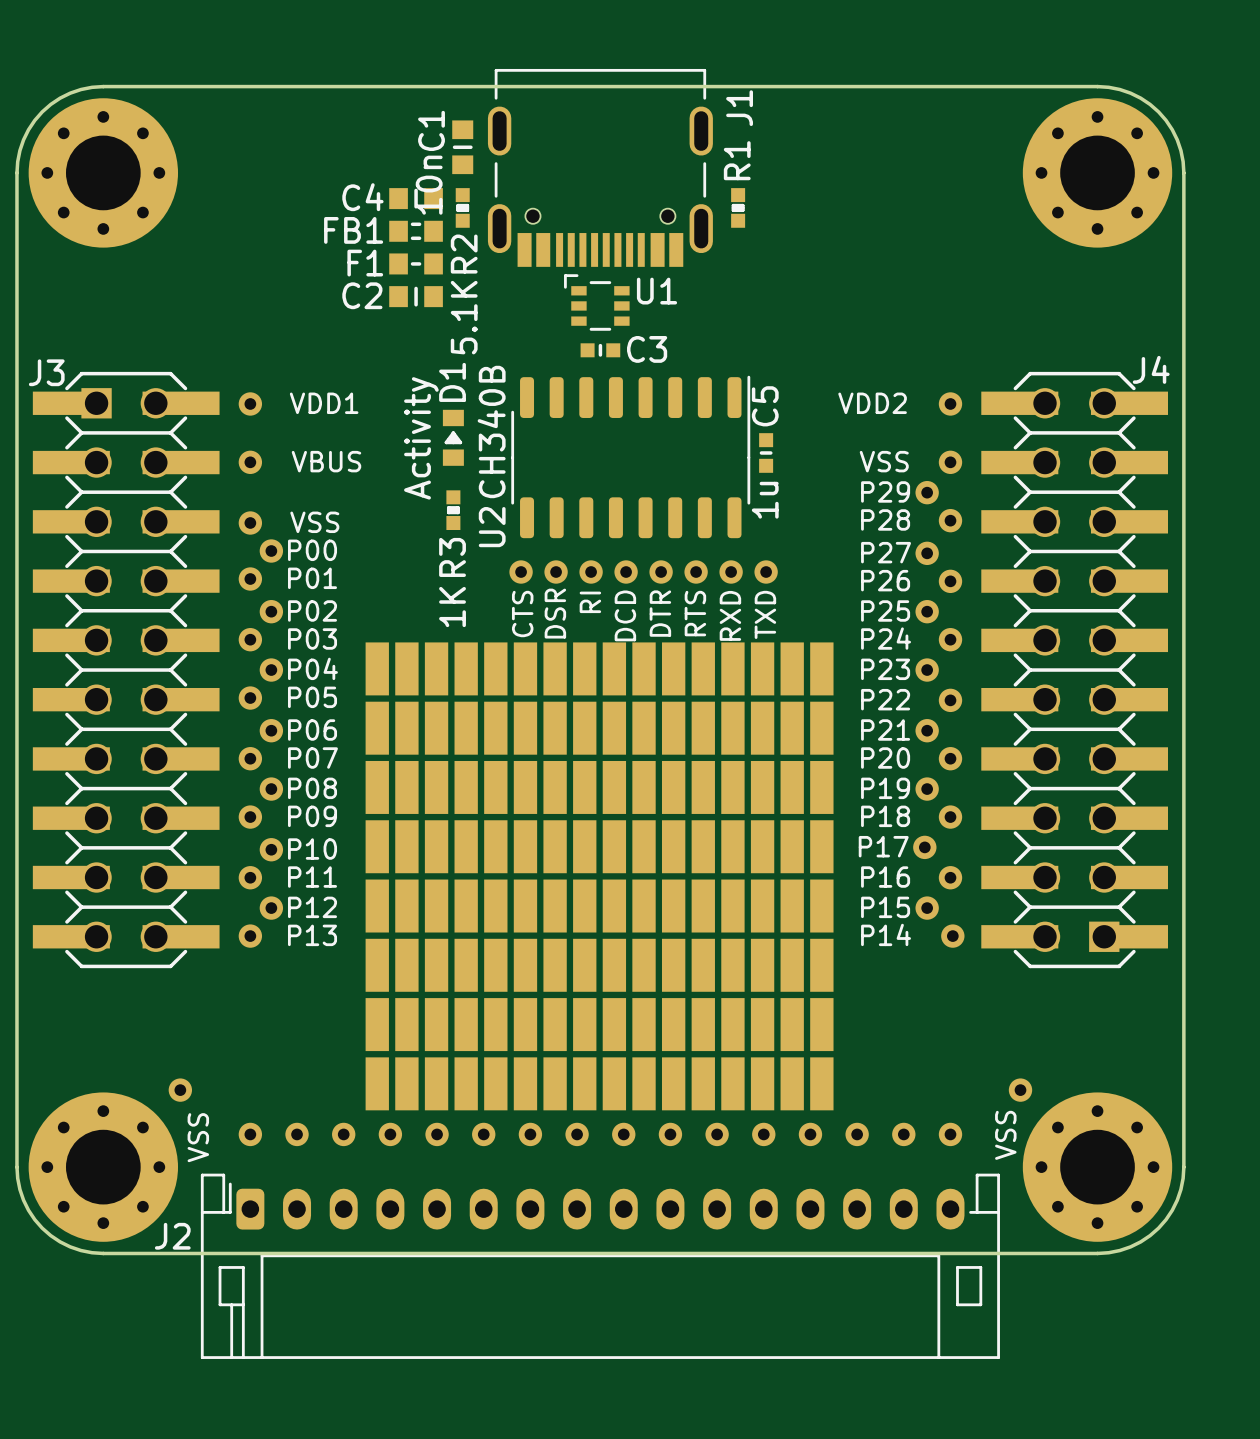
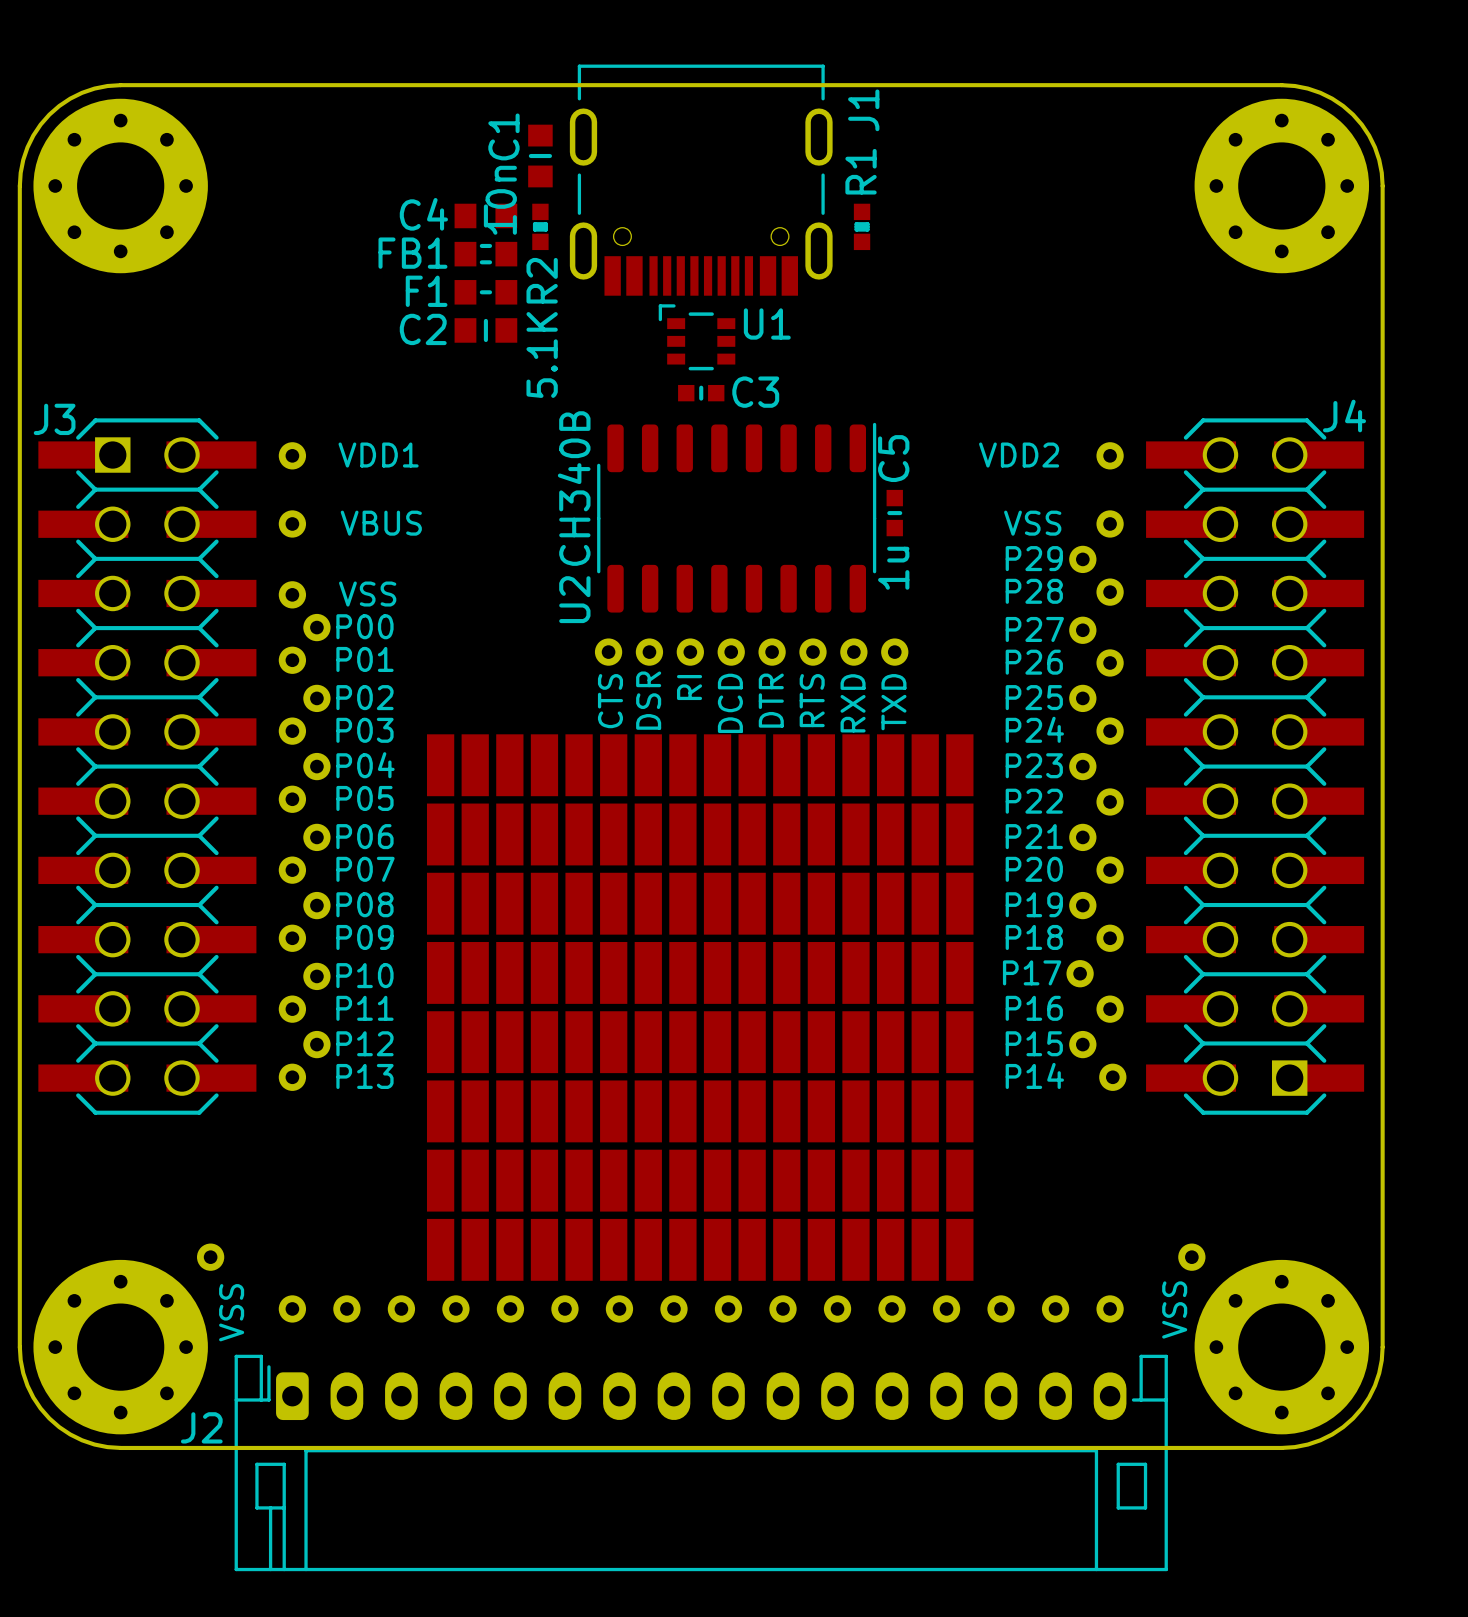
D1: Activity (453, 437) -> none
R3: 1K (453, 510) -> none

